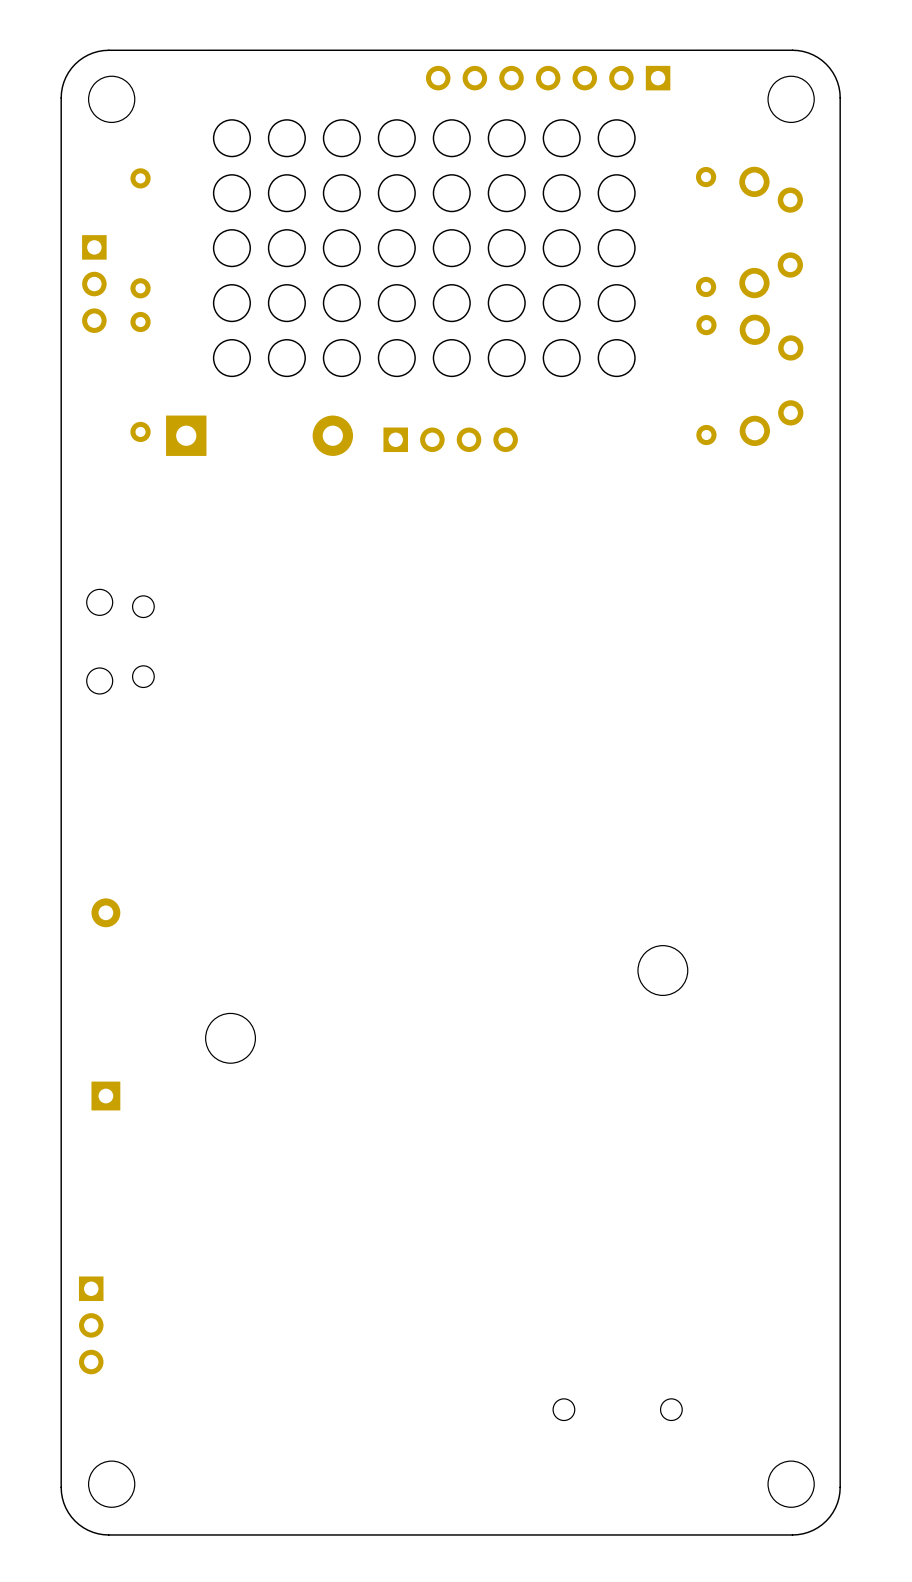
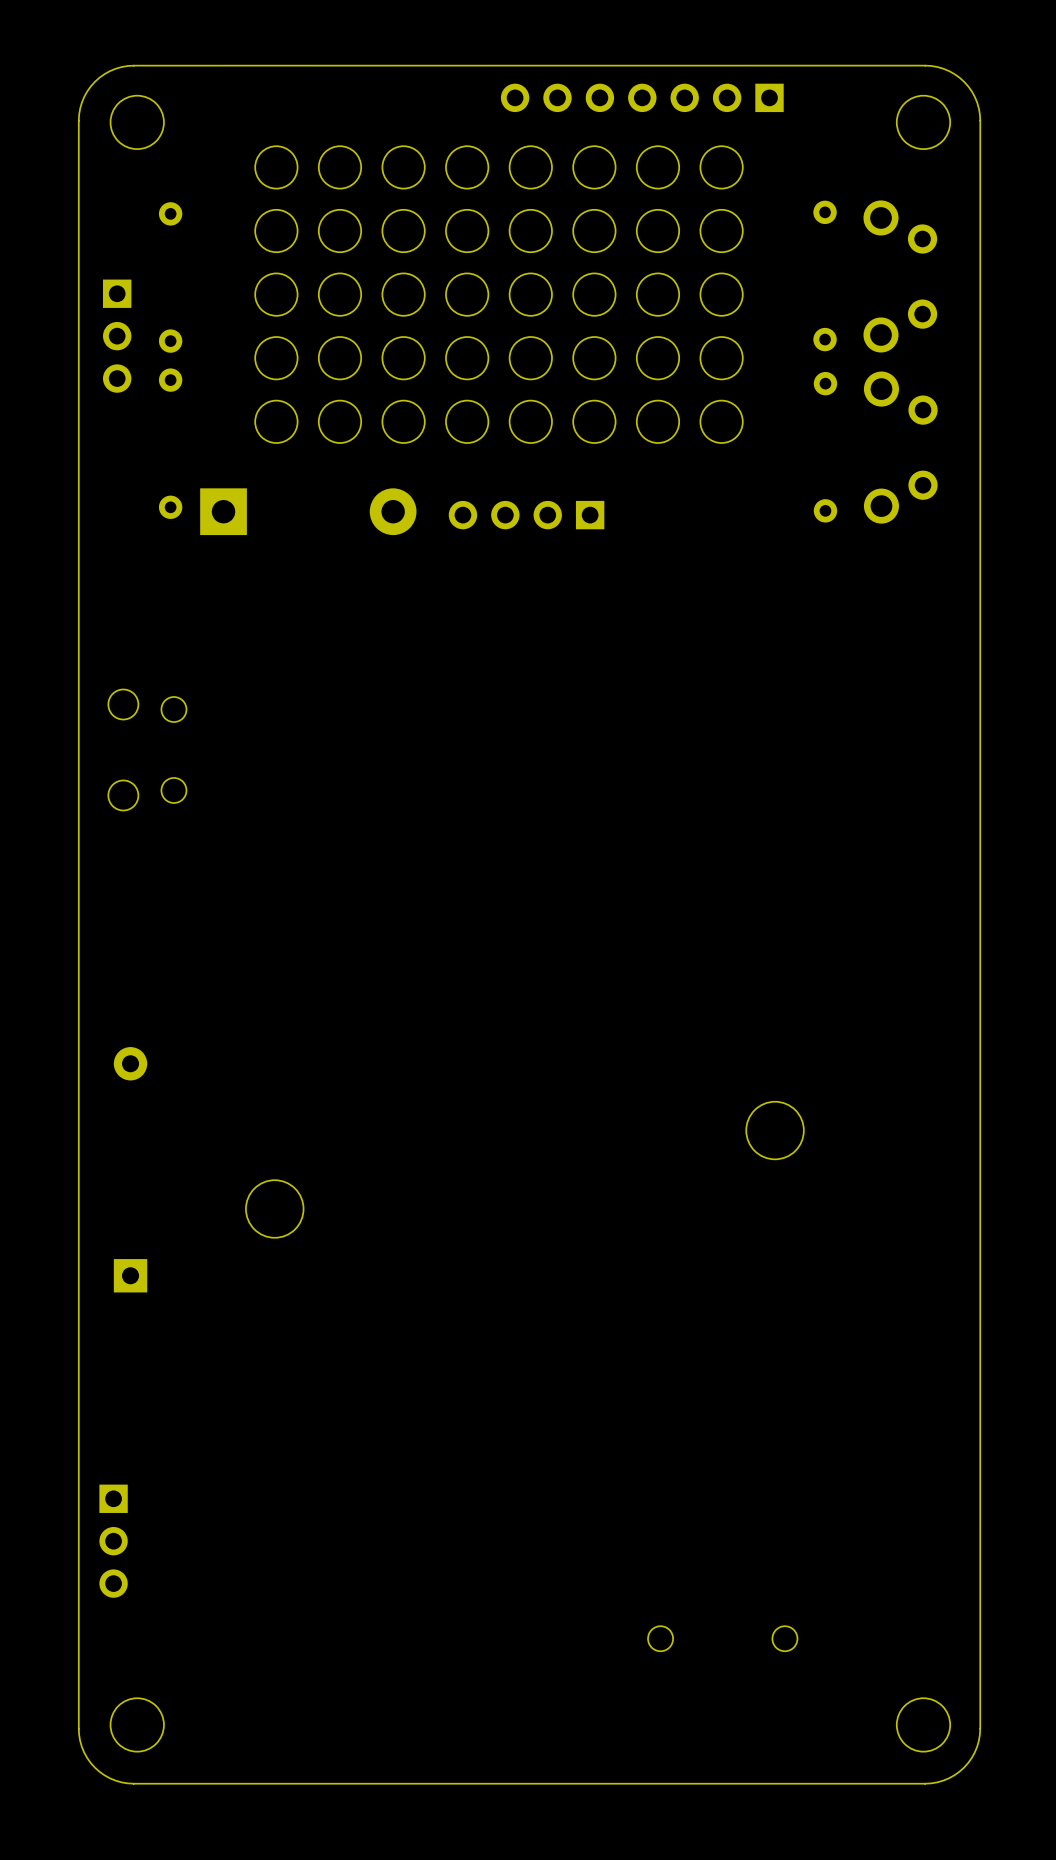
part rotation: 0° (450, 439) -> 180° (526, 515)

